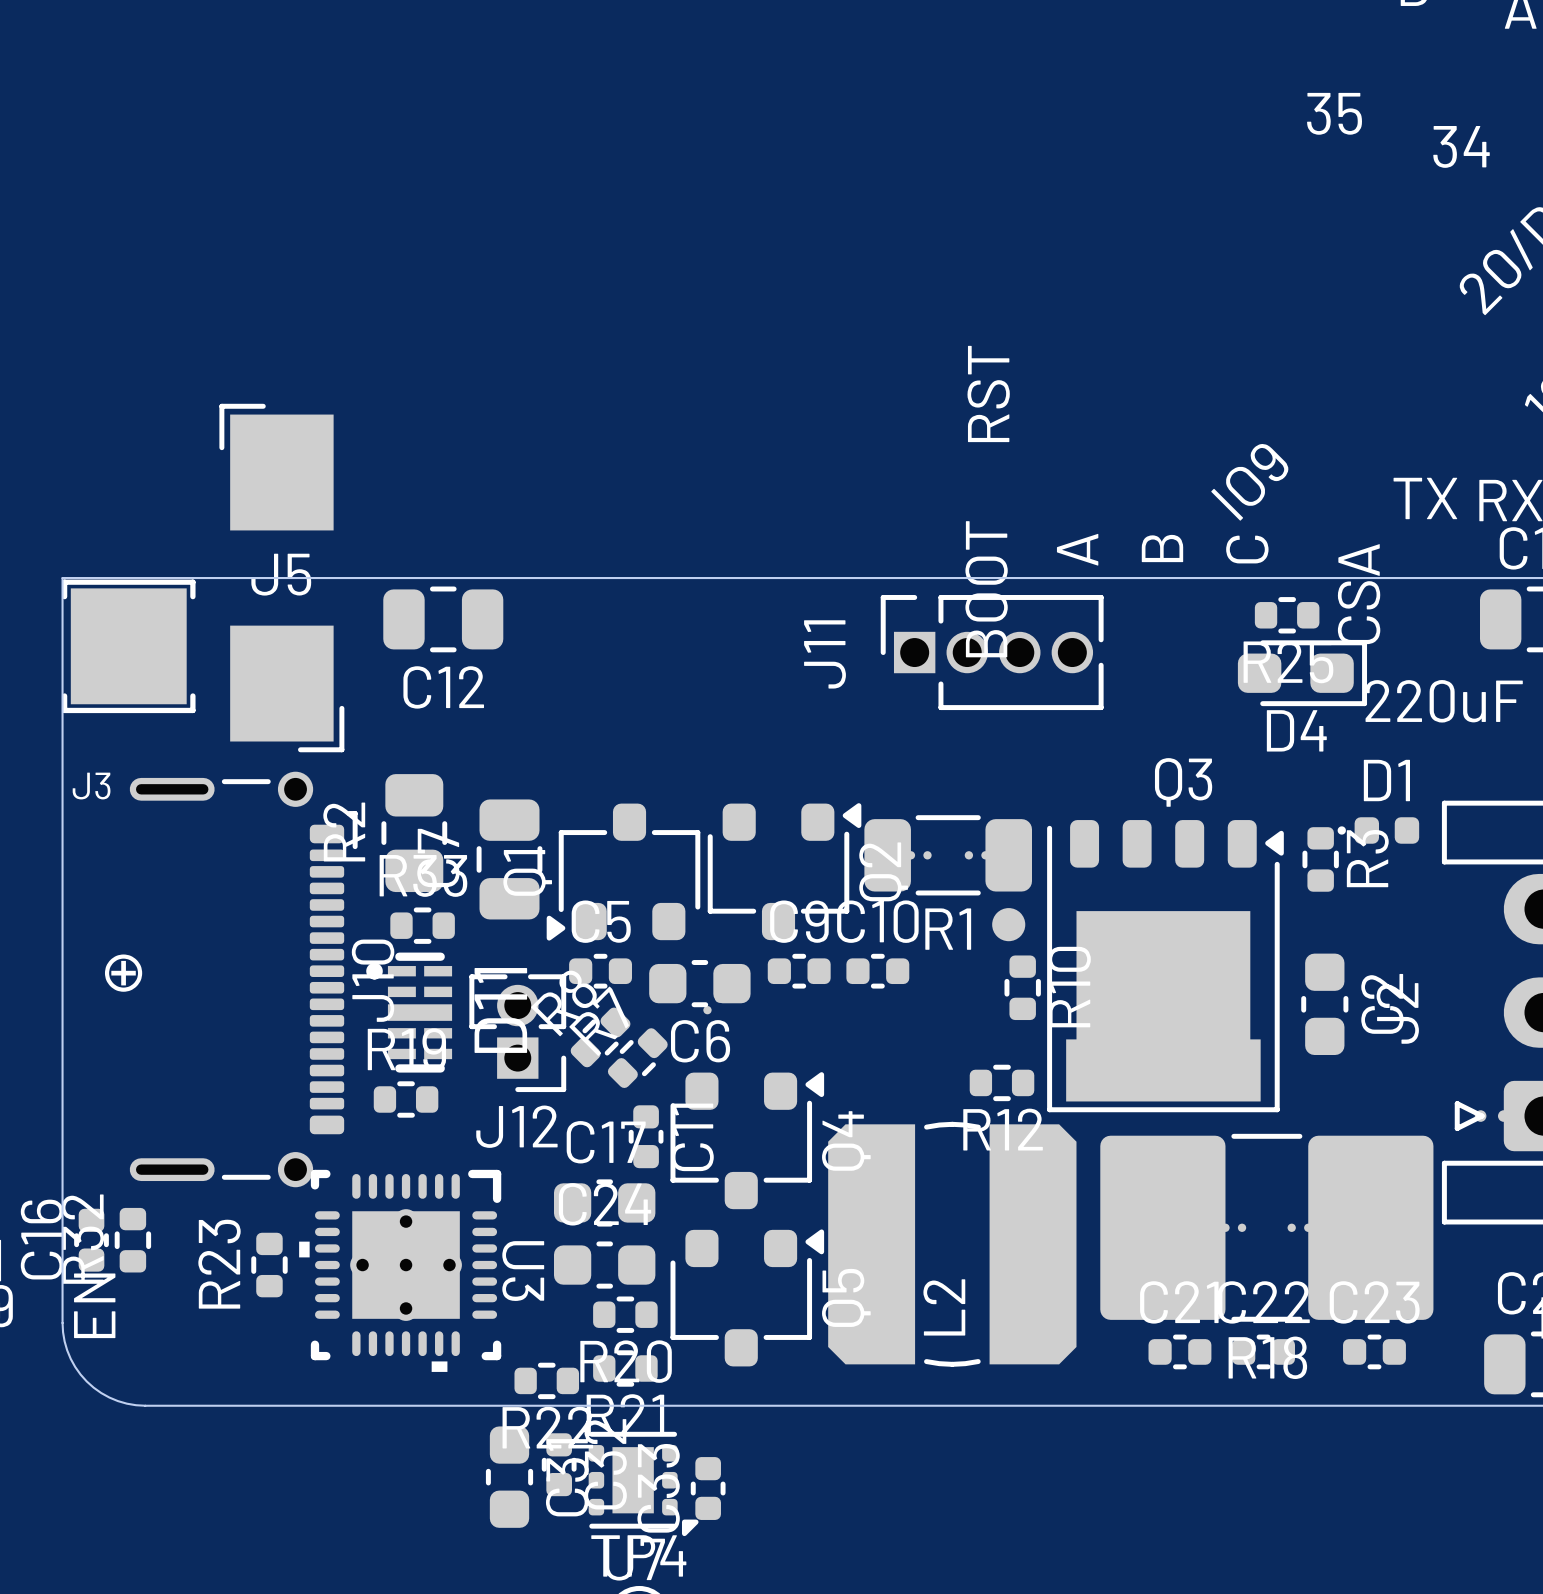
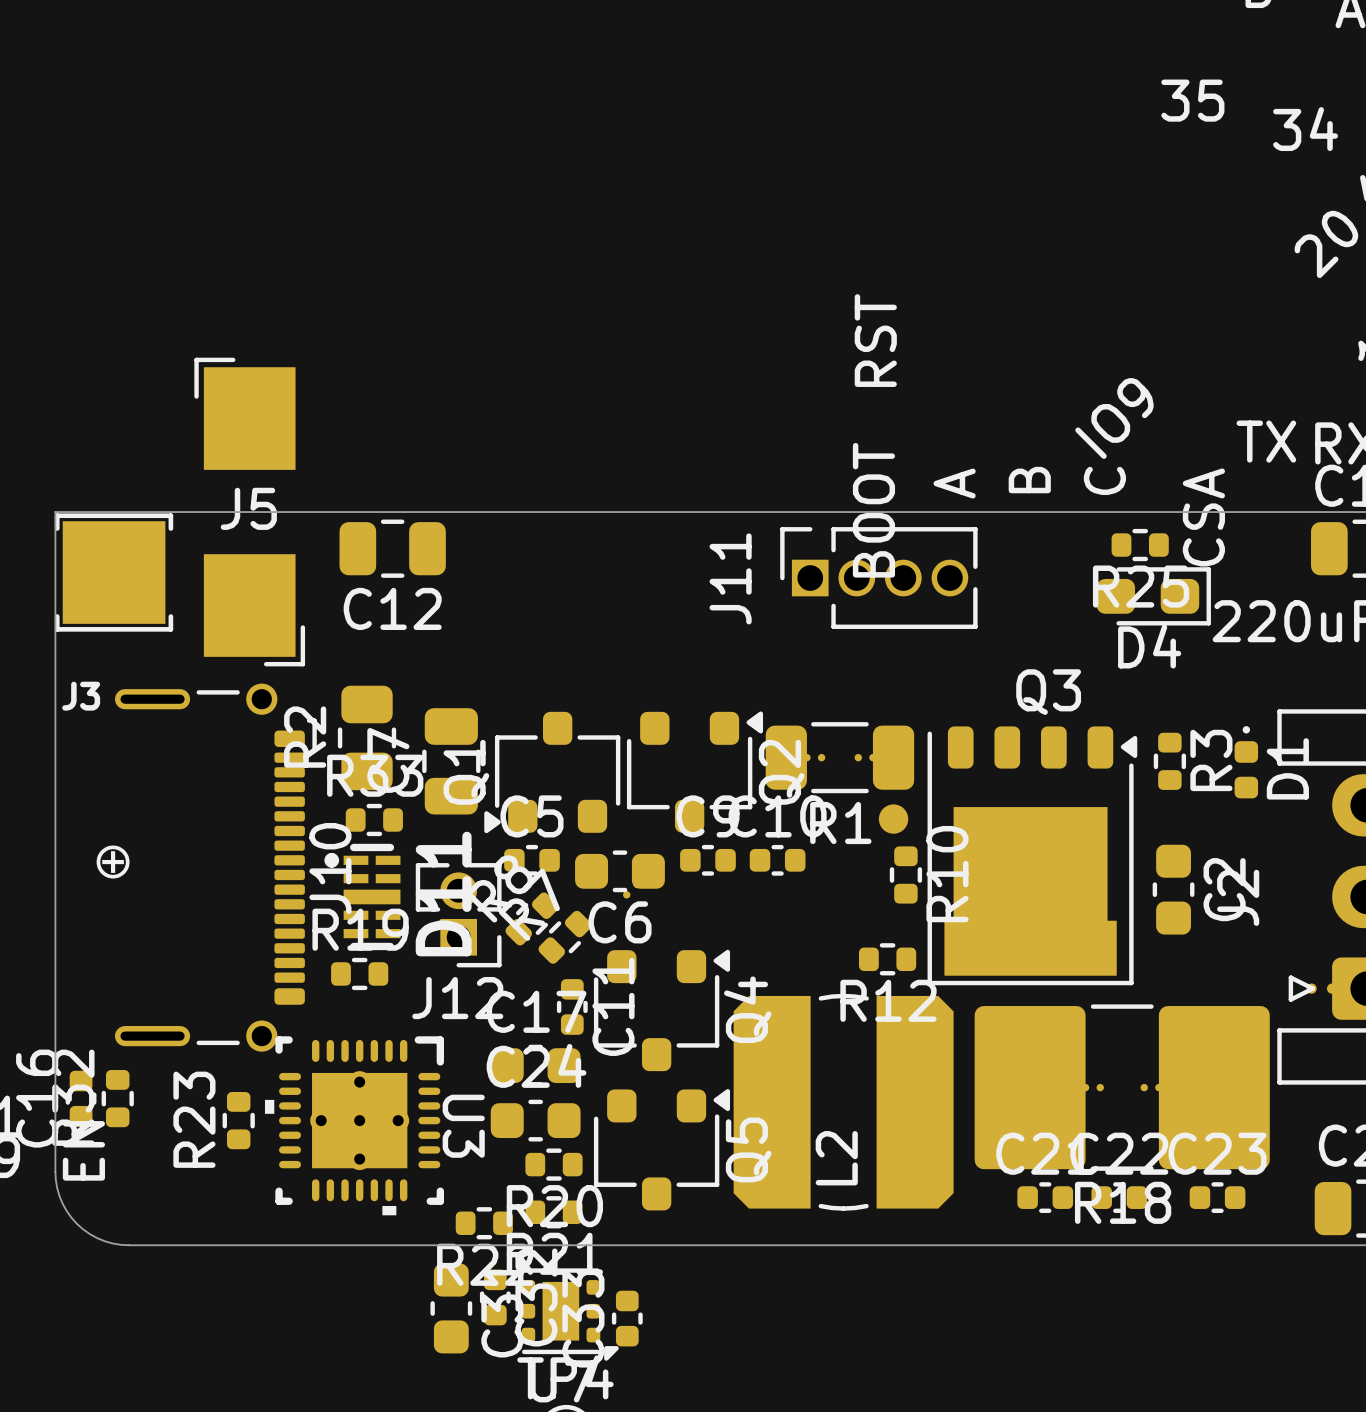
D1 rotation: 0° (1378, 830) -> 90° clockwise (1246, 762)

